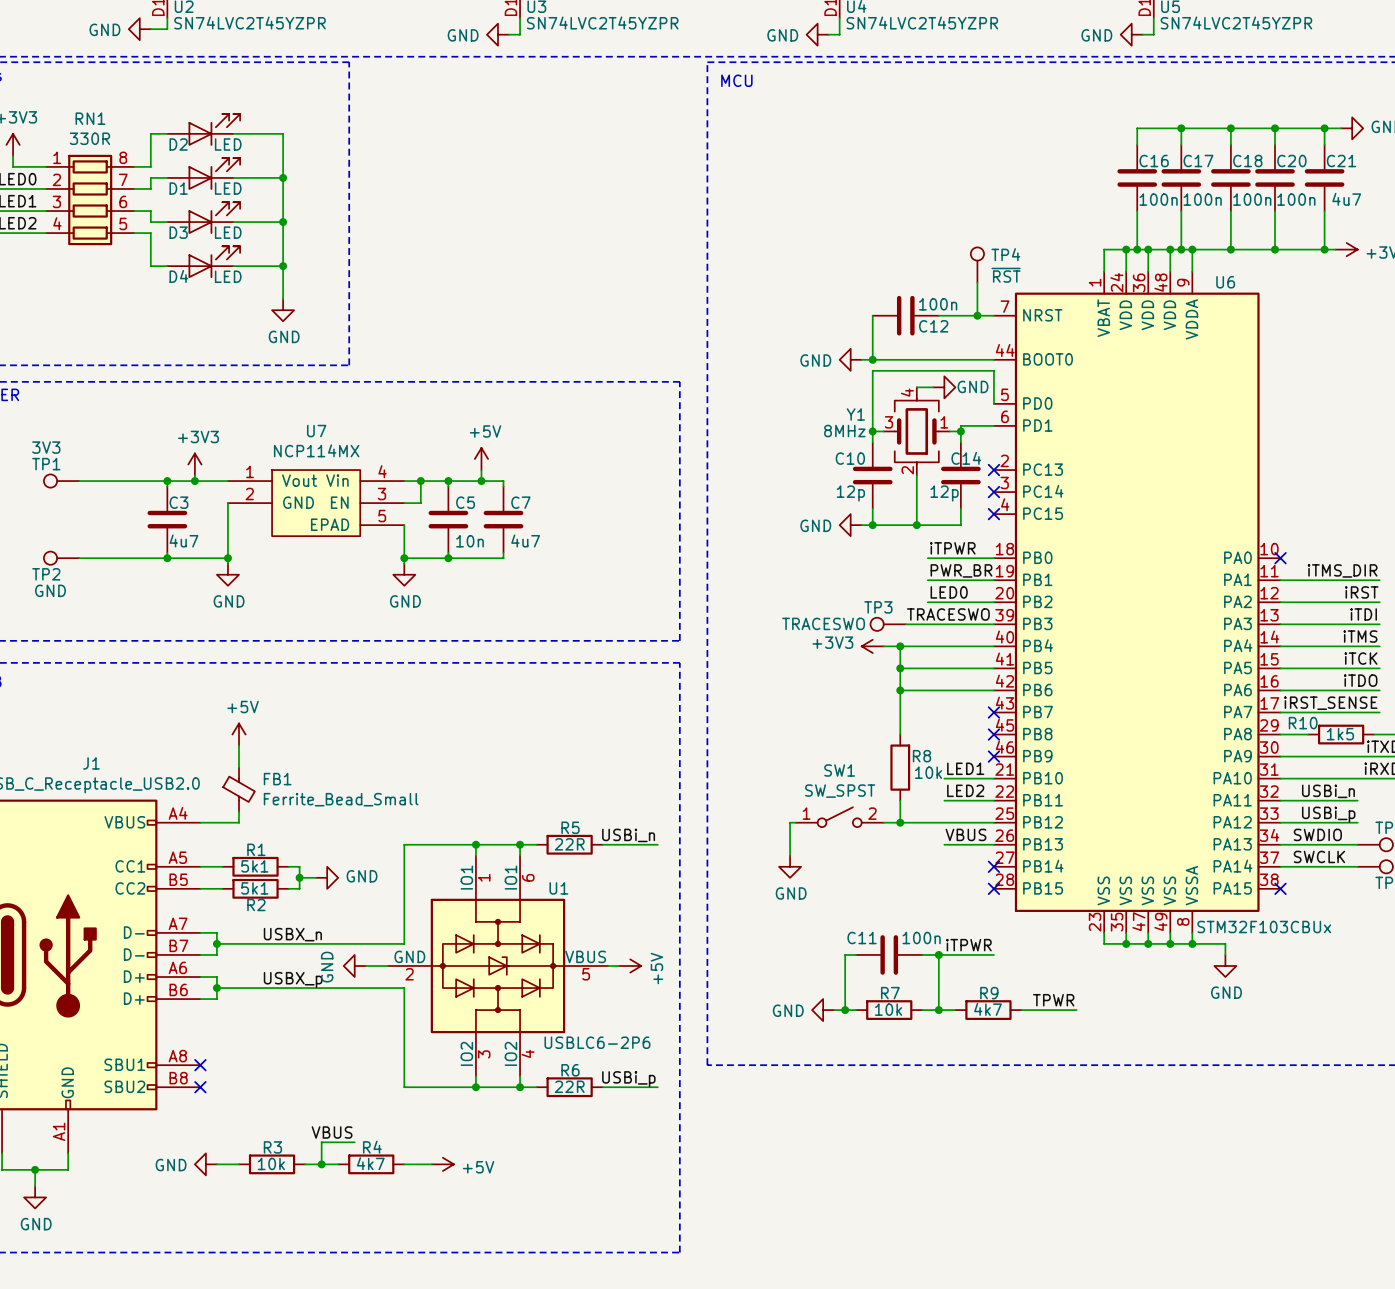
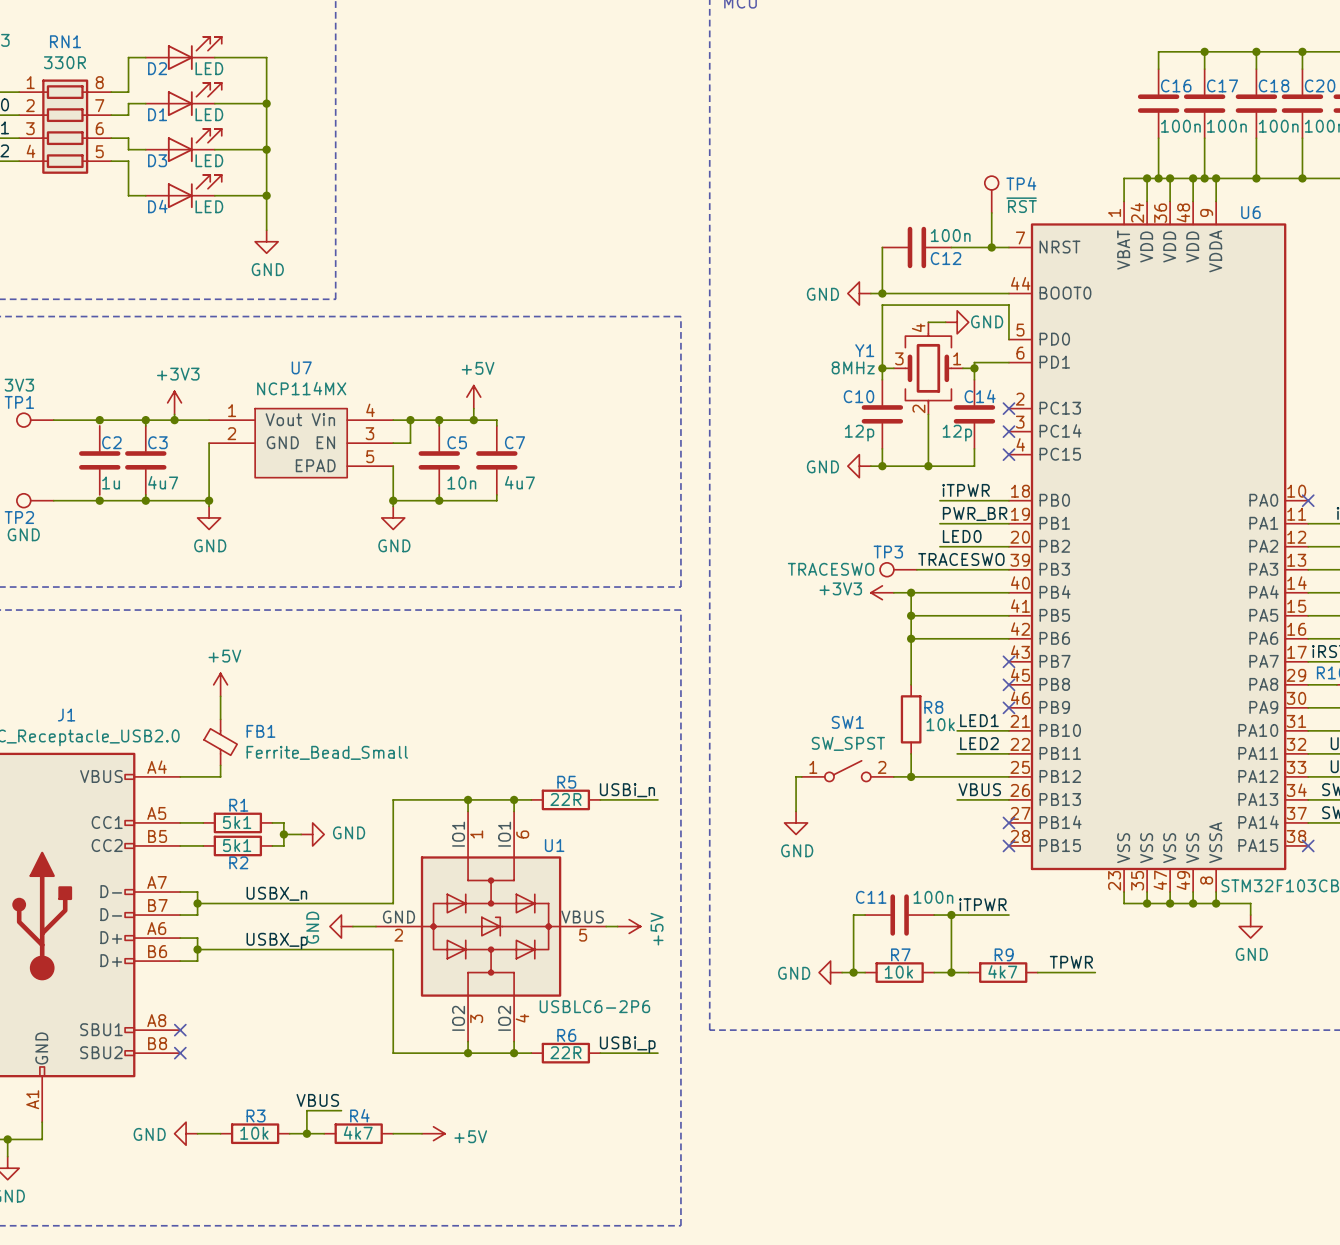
junction: none -> (99, 420)
C2: none -> 1u (99, 460)
junction: none -> (99, 500)

